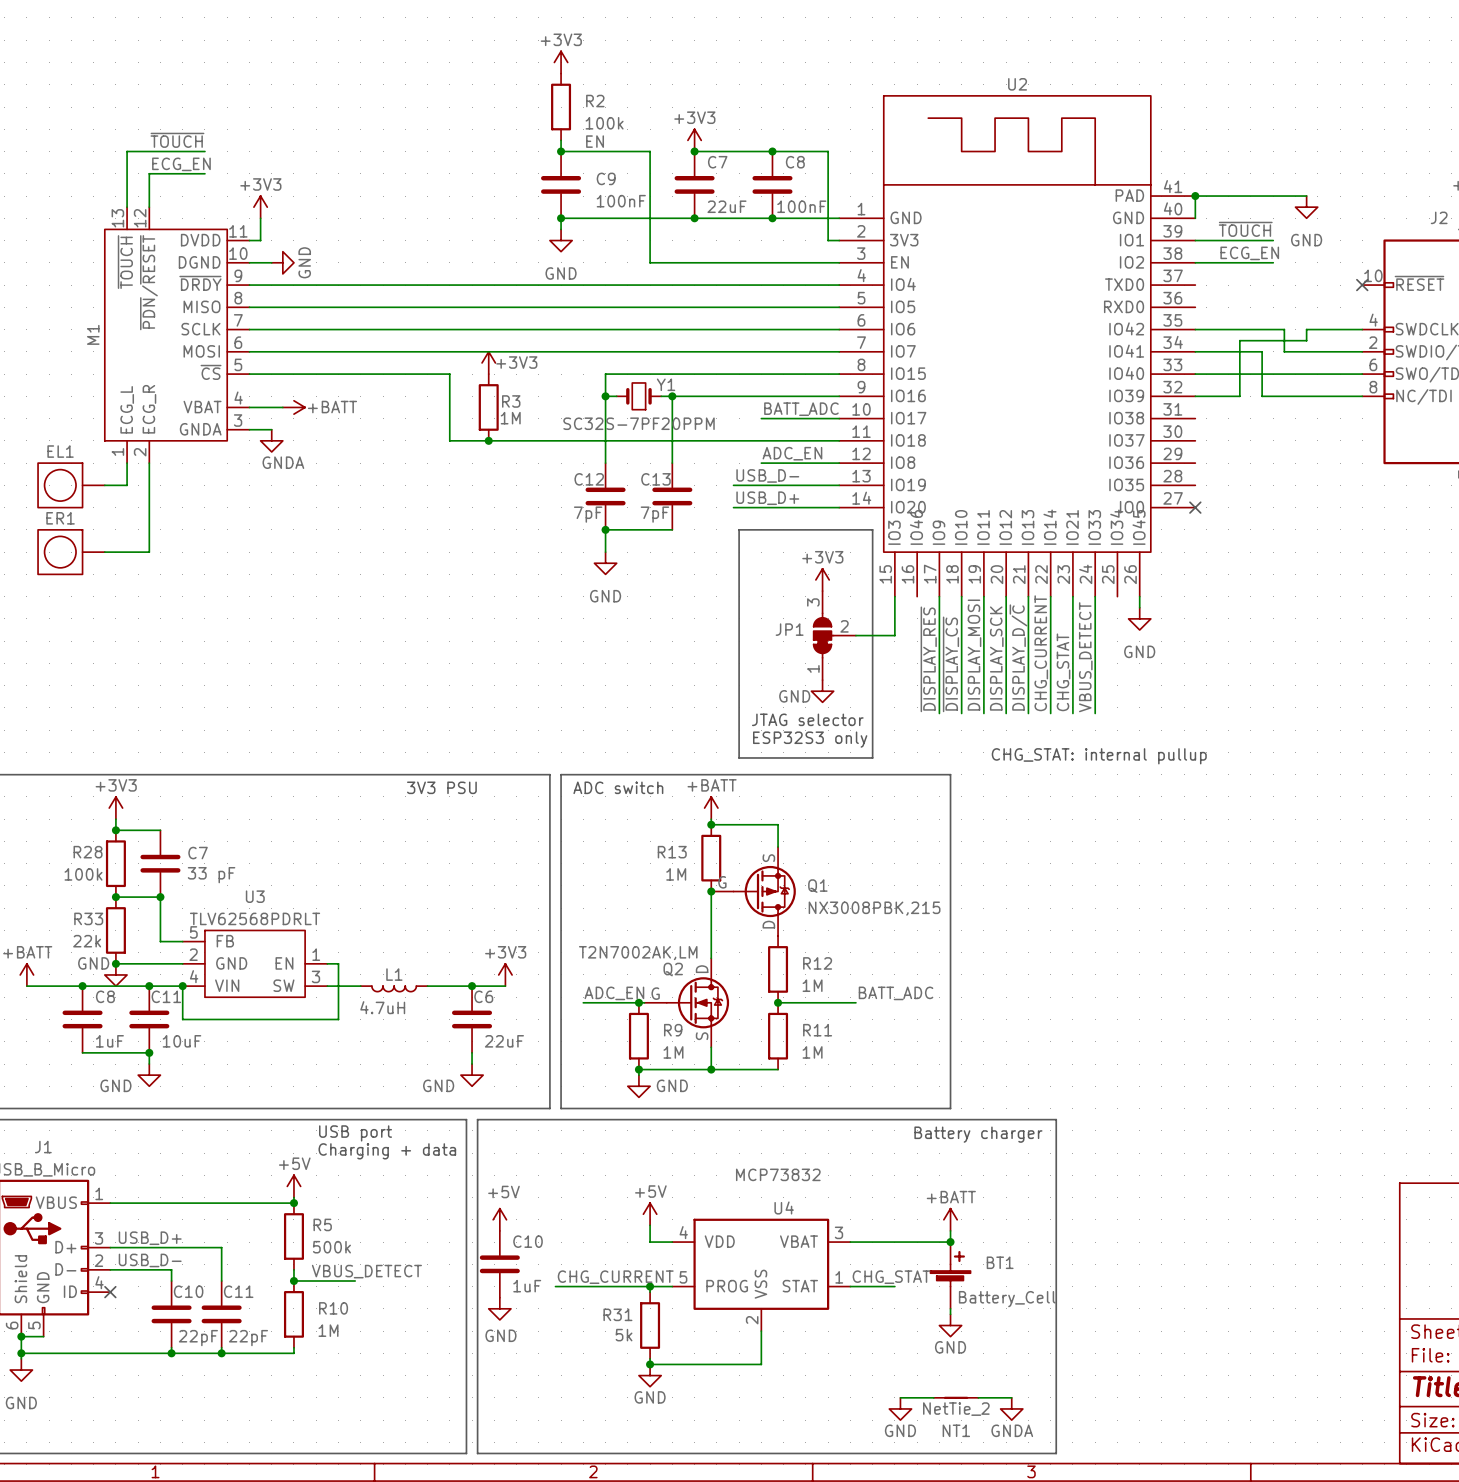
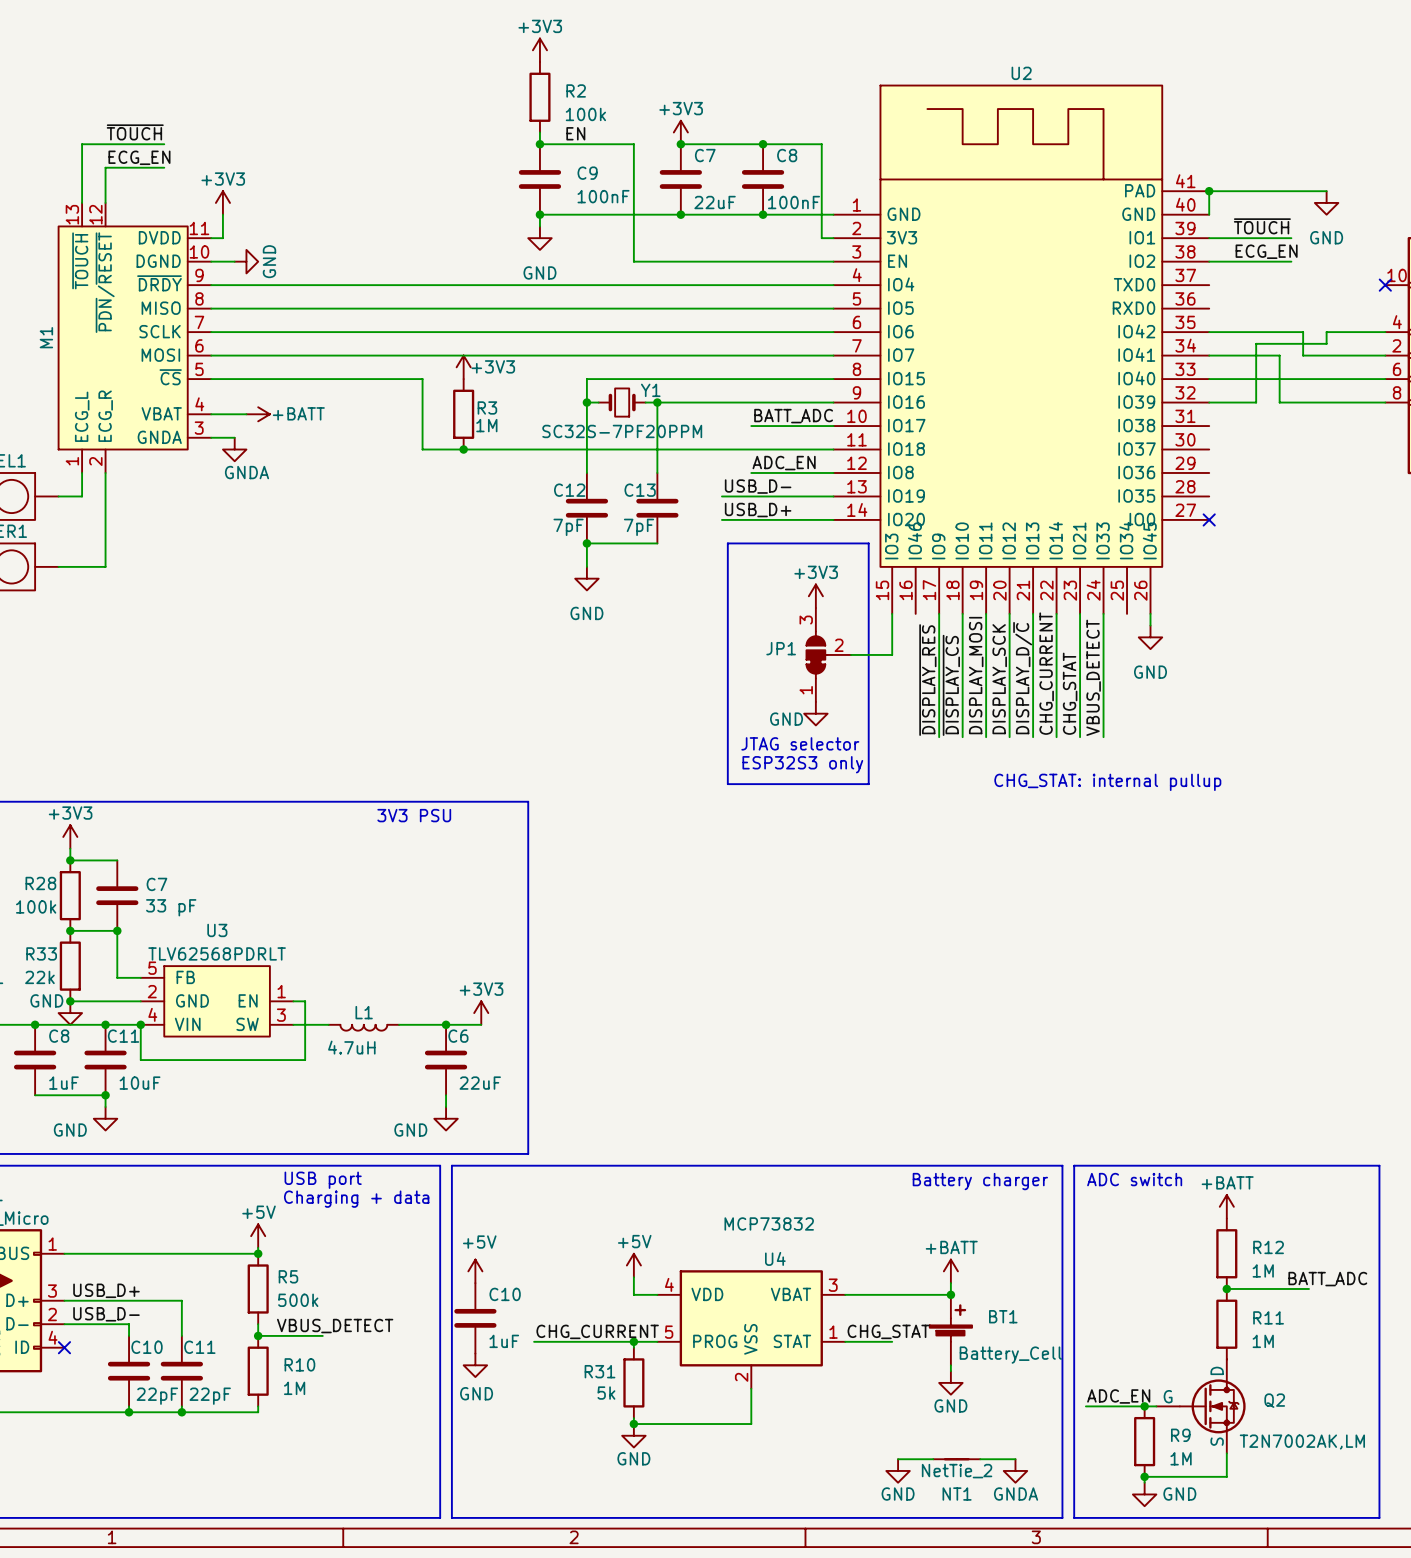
line: (561, 774) (950, 774) (950, 1108) (561, 1108) (561, 774) -> none
text: ADC switch (618, 787) -> none
power symbol: +BATT (711, 808) -> none
wire: (711, 819) (711, 824) (778, 824) (778, 847) -> none
junction: (711, 824) -> none
R13: 1M (711, 858) -> none
wire: (711, 891) (711, 958) -> none
junction: (711, 891) -> none
Q1: NX3008PBK,215 (753, 891) -> none
Q2 value position: T2N7002AK,LM (638, 953) -> T2N7002AK,LM (1302, 1442)
Q2 name position: Q2 (673, 969) -> Q2 (1274, 1400)
R12 position: (778, 969) -> (1226, 1253)
label: ADC_EN (614, 993) -> none
label: BATT_ADC (896, 993) -> none
wire: (583, 1002) (644, 1002) -> none
junction: (638, 1002) -> none
Q2 position: (686, 1002) -> (1200, 1406)
wire: (778, 1002) (855, 1002) -> none
junction: (778, 1002) -> none
R9 position: (638, 1036) -> (1144, 1441)
R11 position: (778, 1036) -> (1226, 1324)
wire: (711, 1047) (711, 1069) -> none
junction: (638, 1069) -> none
junction: (711, 1069) -> none
wire: (778, 1069) (638, 1069) (638, 1075) -> none
power symbol: GND (638, 1086) -> none
line: none -> (1074, 1165) (1379, 1165) (1379, 1517) (1074, 1517) (1074, 1165)
text: none -> ADC switch (1134, 1179)
power symbol: none -> +BATT (1226, 1206)
label: none -> BATT_ADC (1327, 1279)
wire: none -> (1226, 1288) (1309, 1288)
junction: none -> (1226, 1288)
label: none -> ADC_EN (1118, 1396)
wire: none -> (1085, 1406) (1156, 1406)
junction: none -> (1144, 1406)
wire: none -> (1226, 1453) (1226, 1476) (1144, 1476) (1144, 1482)
junction: none -> (1144, 1476)
power symbol: none -> GND (1144, 1494)

